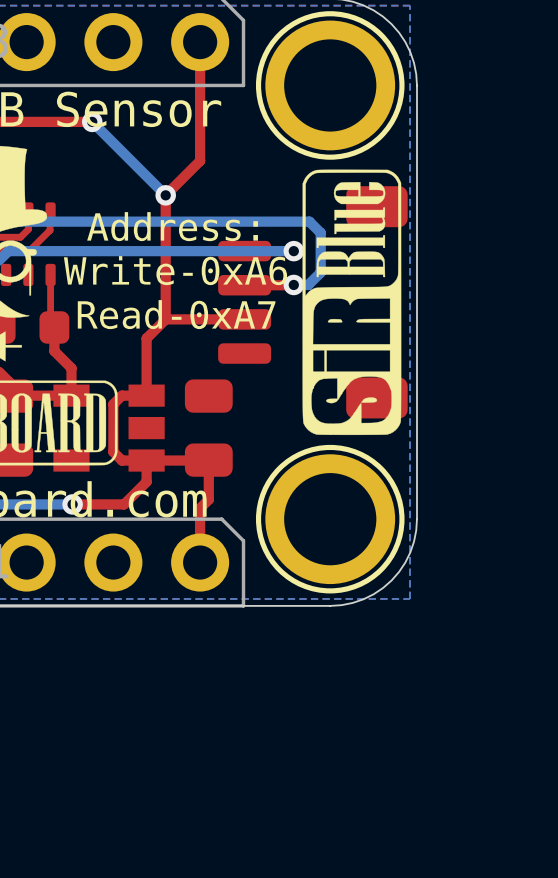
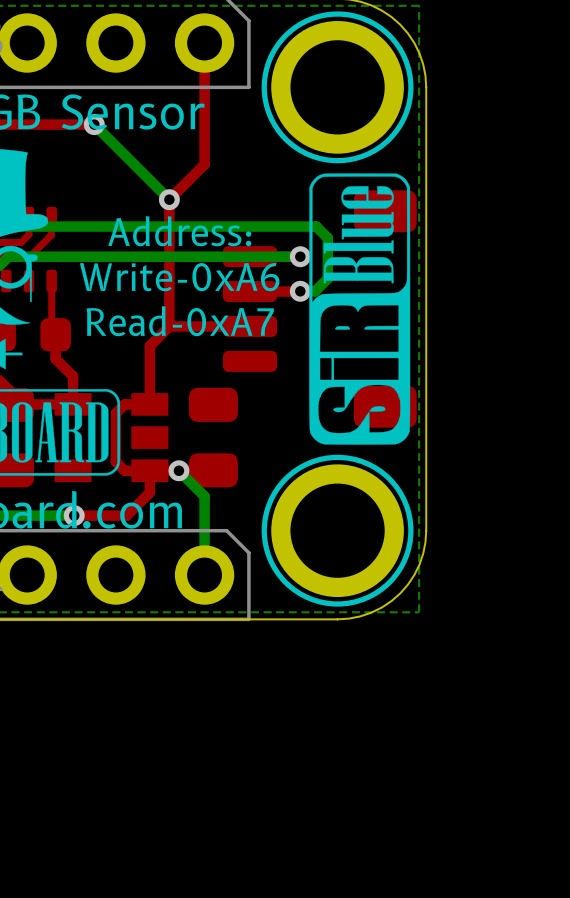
bottom track: none -> (178, 470) (204, 496) (204, 575)
via: none -> (178, 470)
top track: (208, 460) (208, 499) (200, 508) (200, 562) -> none

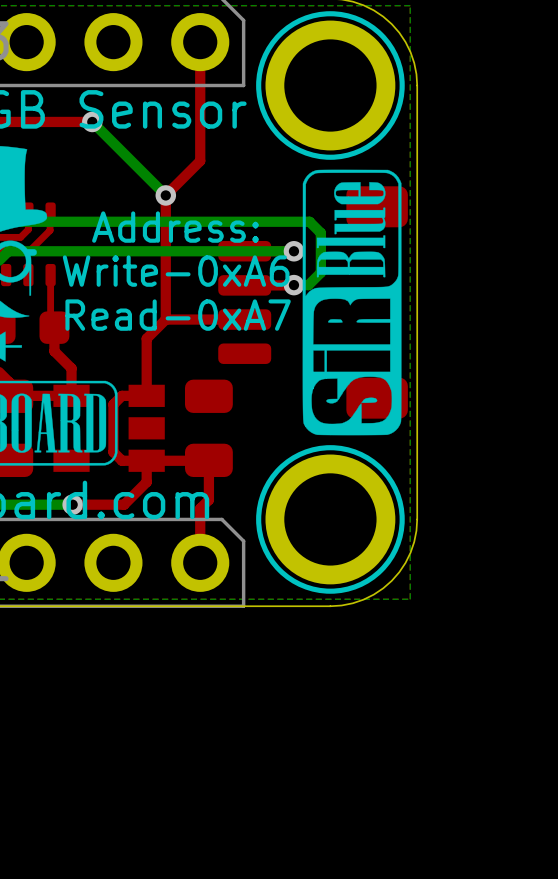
bottom track: (178, 470) (204, 496) (204, 575) -> none
via: (178, 470) -> none
top track: none -> (208, 460) (208, 499) (200, 508) (200, 562)

